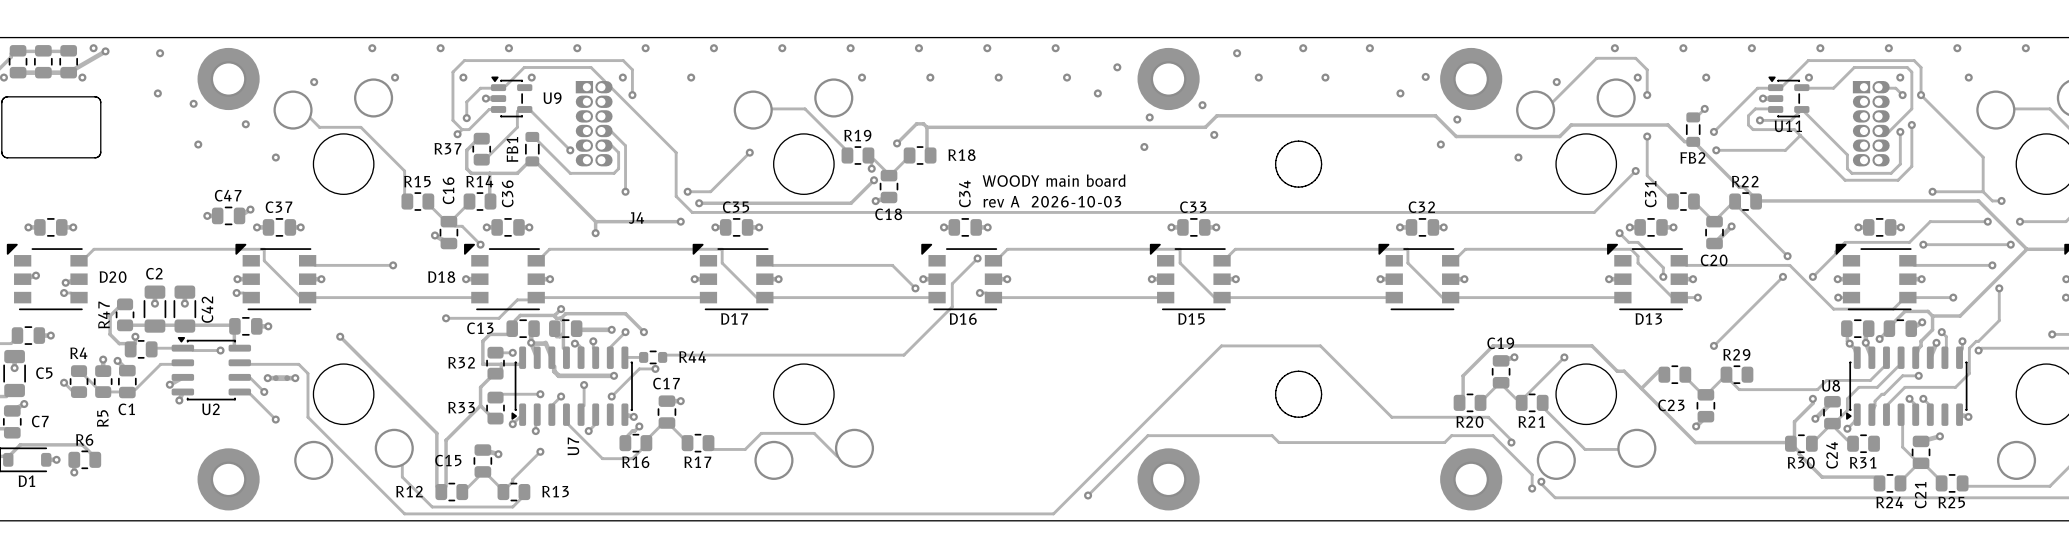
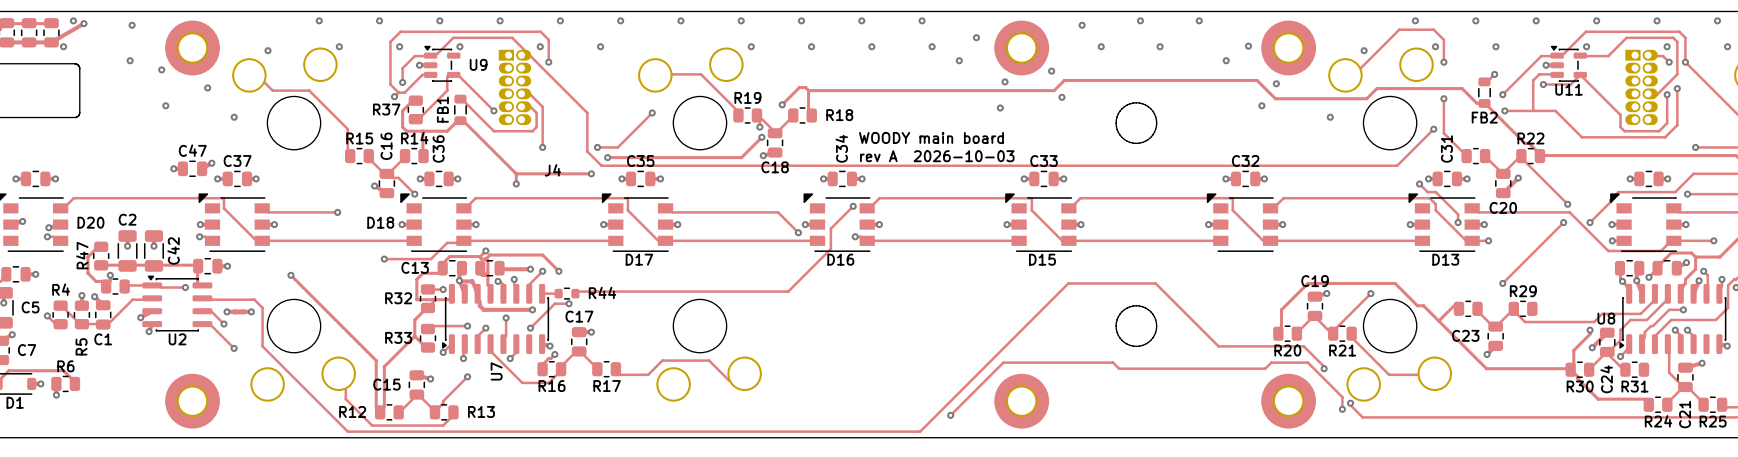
track: (1748, 125) (1753, 129) (1794, 129) (1845, 180) -> (1555, 110) (1581, 137) (1618, 137)
track: none -> (1533, 88) (1533, 110)
track: (1800, 135) (1785, 150) (1773, 150) -> none

